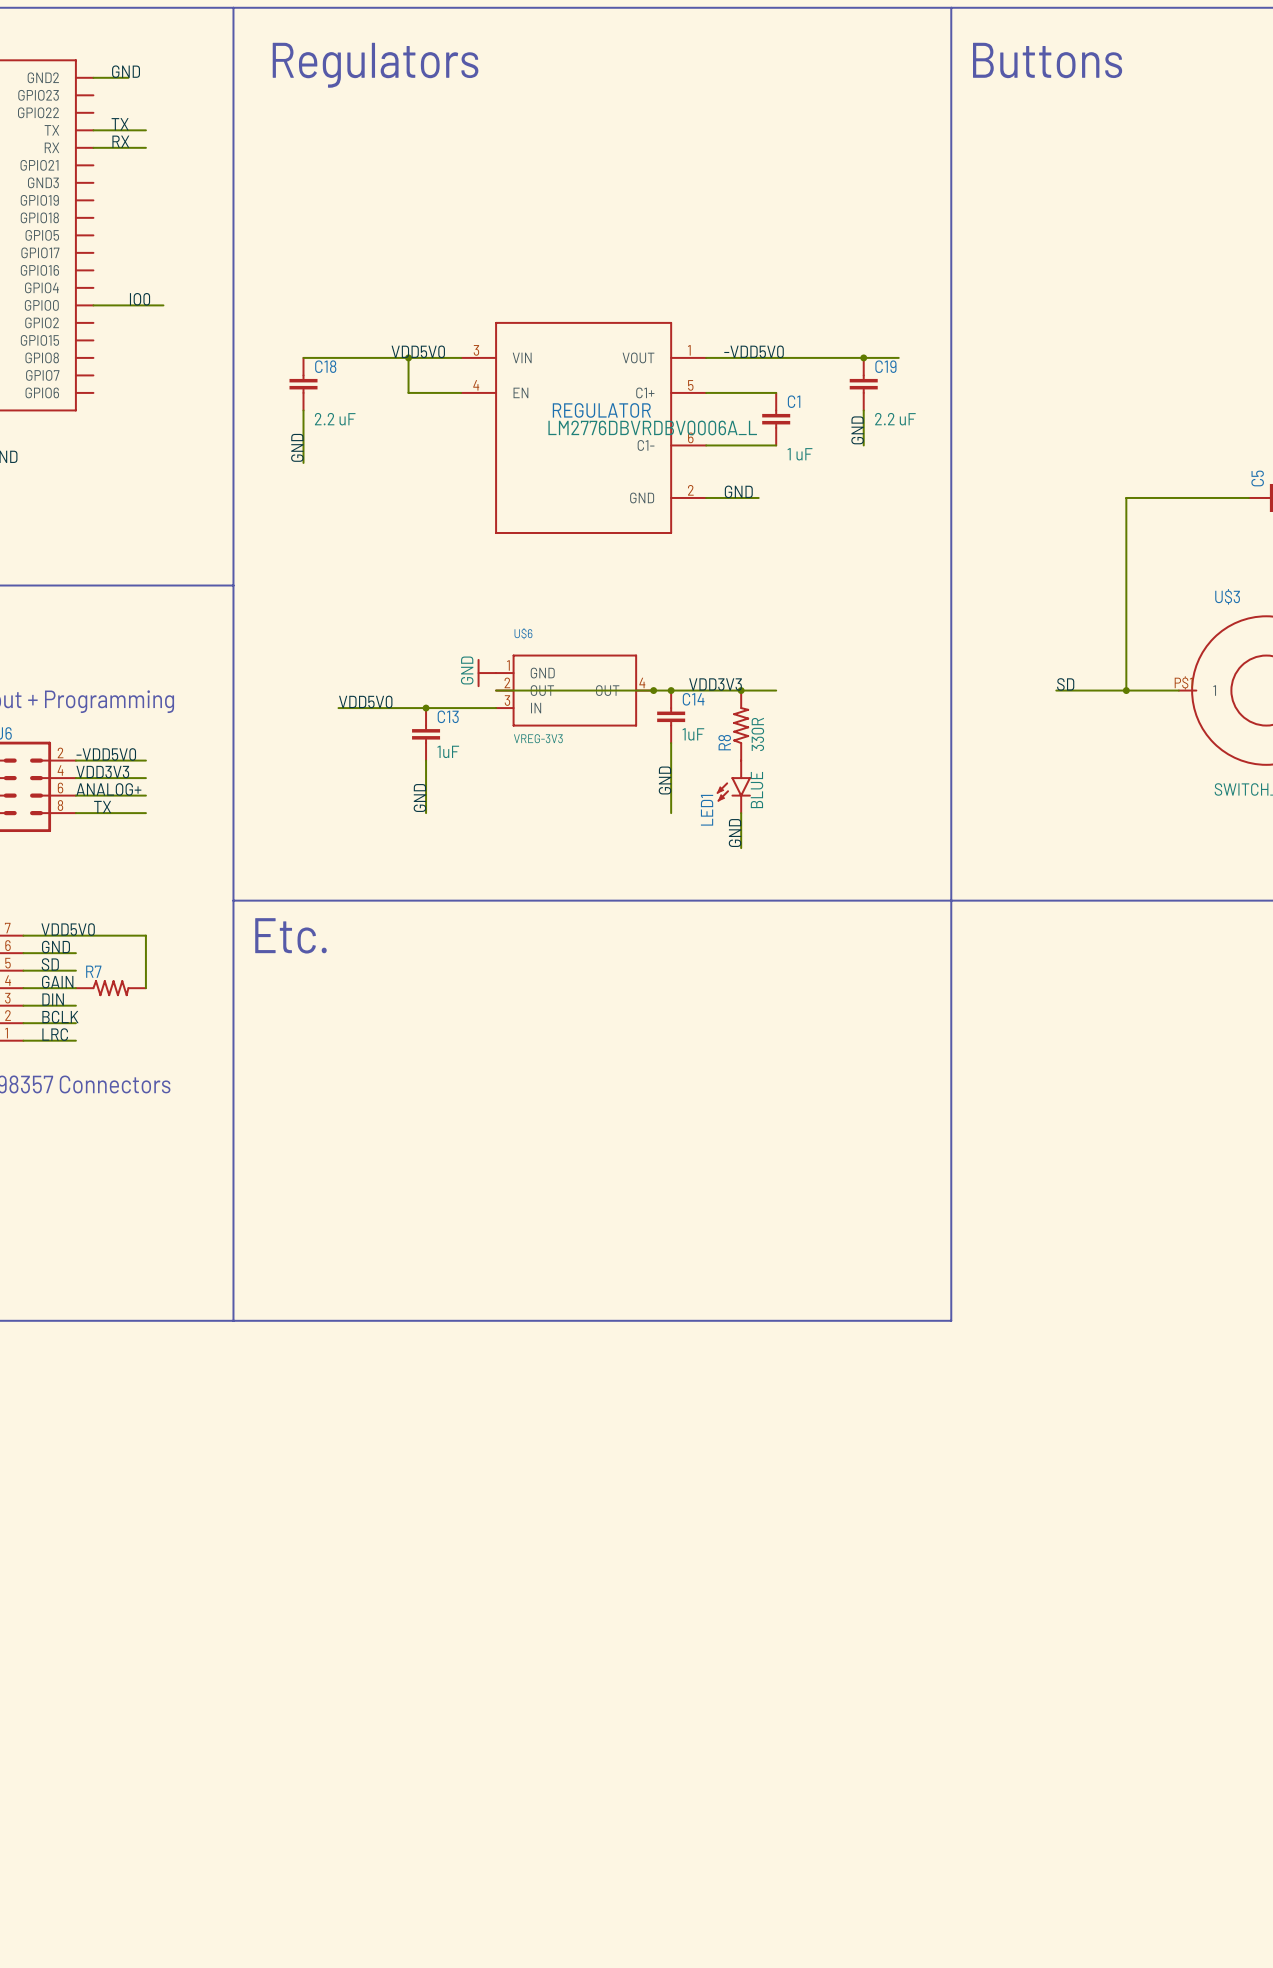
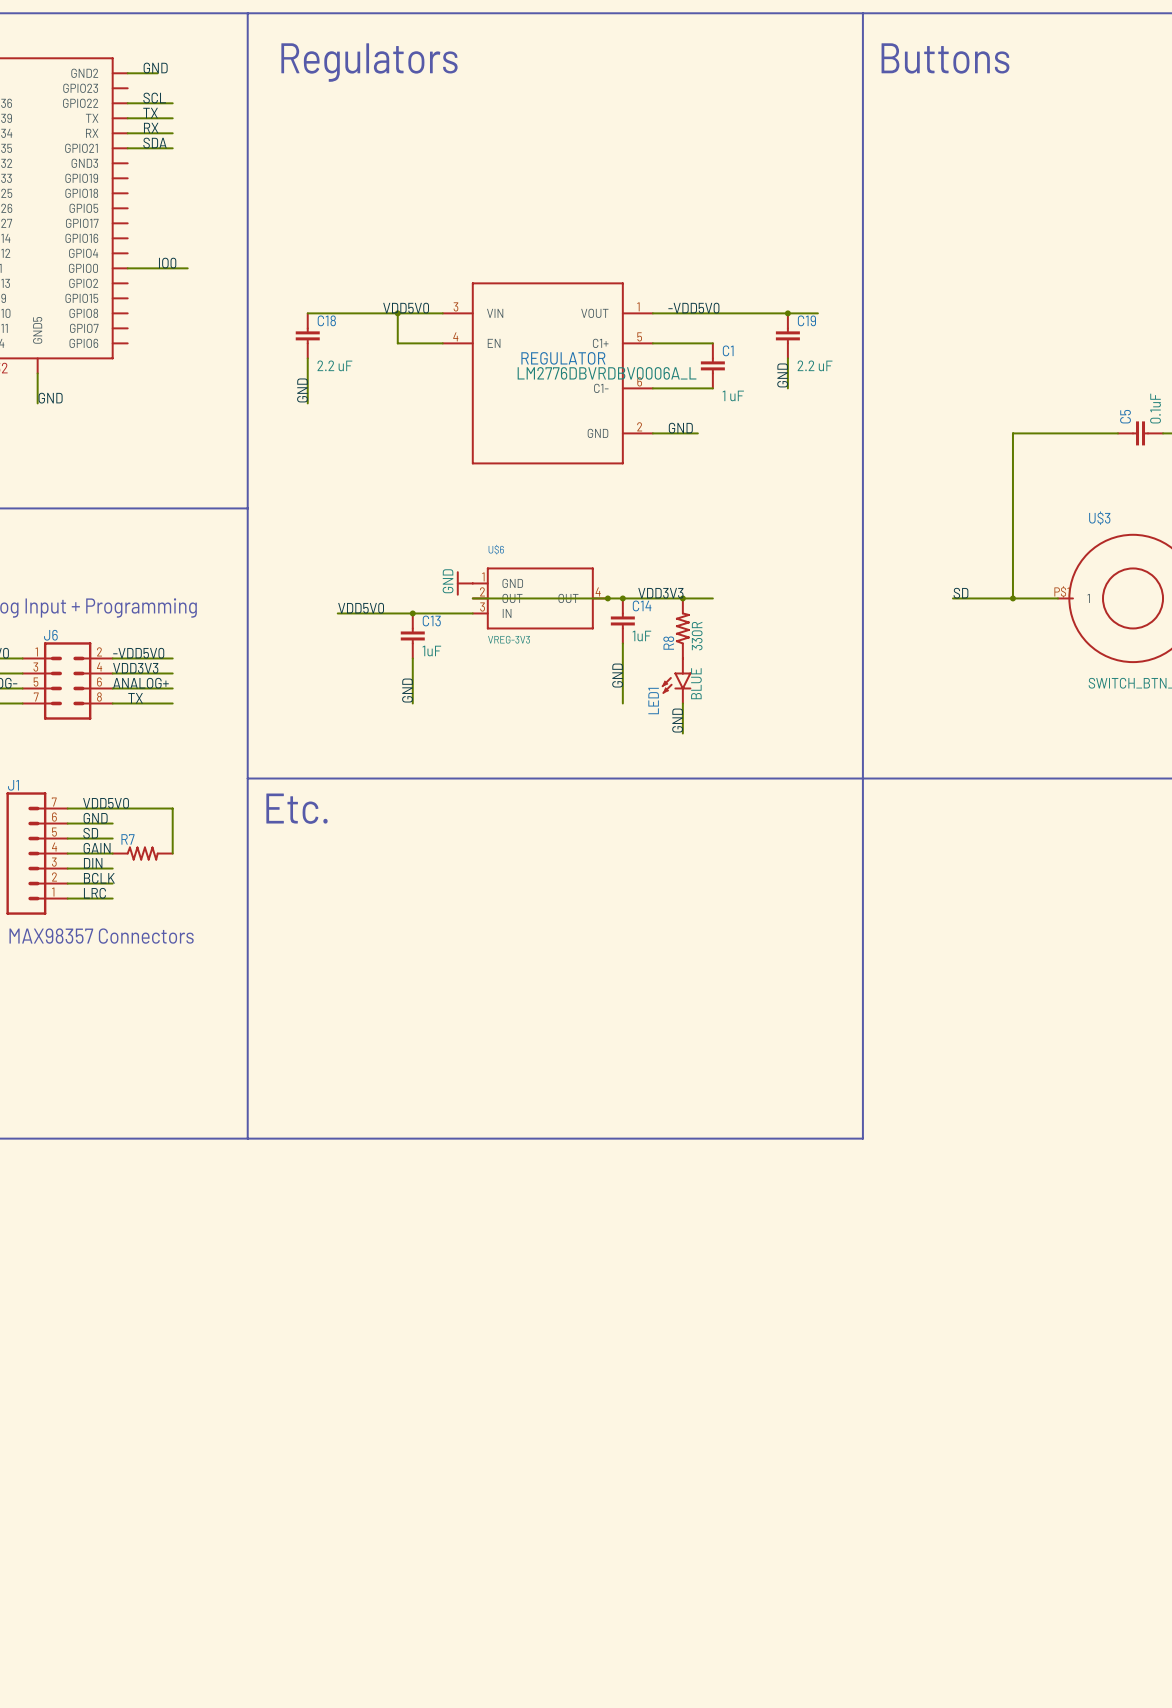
label: none -> SCL (154, 98)
wire: none -> (127, 103) (172, 103)
label: none -> SDA (155, 143)
wire: none -> (127, 148) (172, 148)

